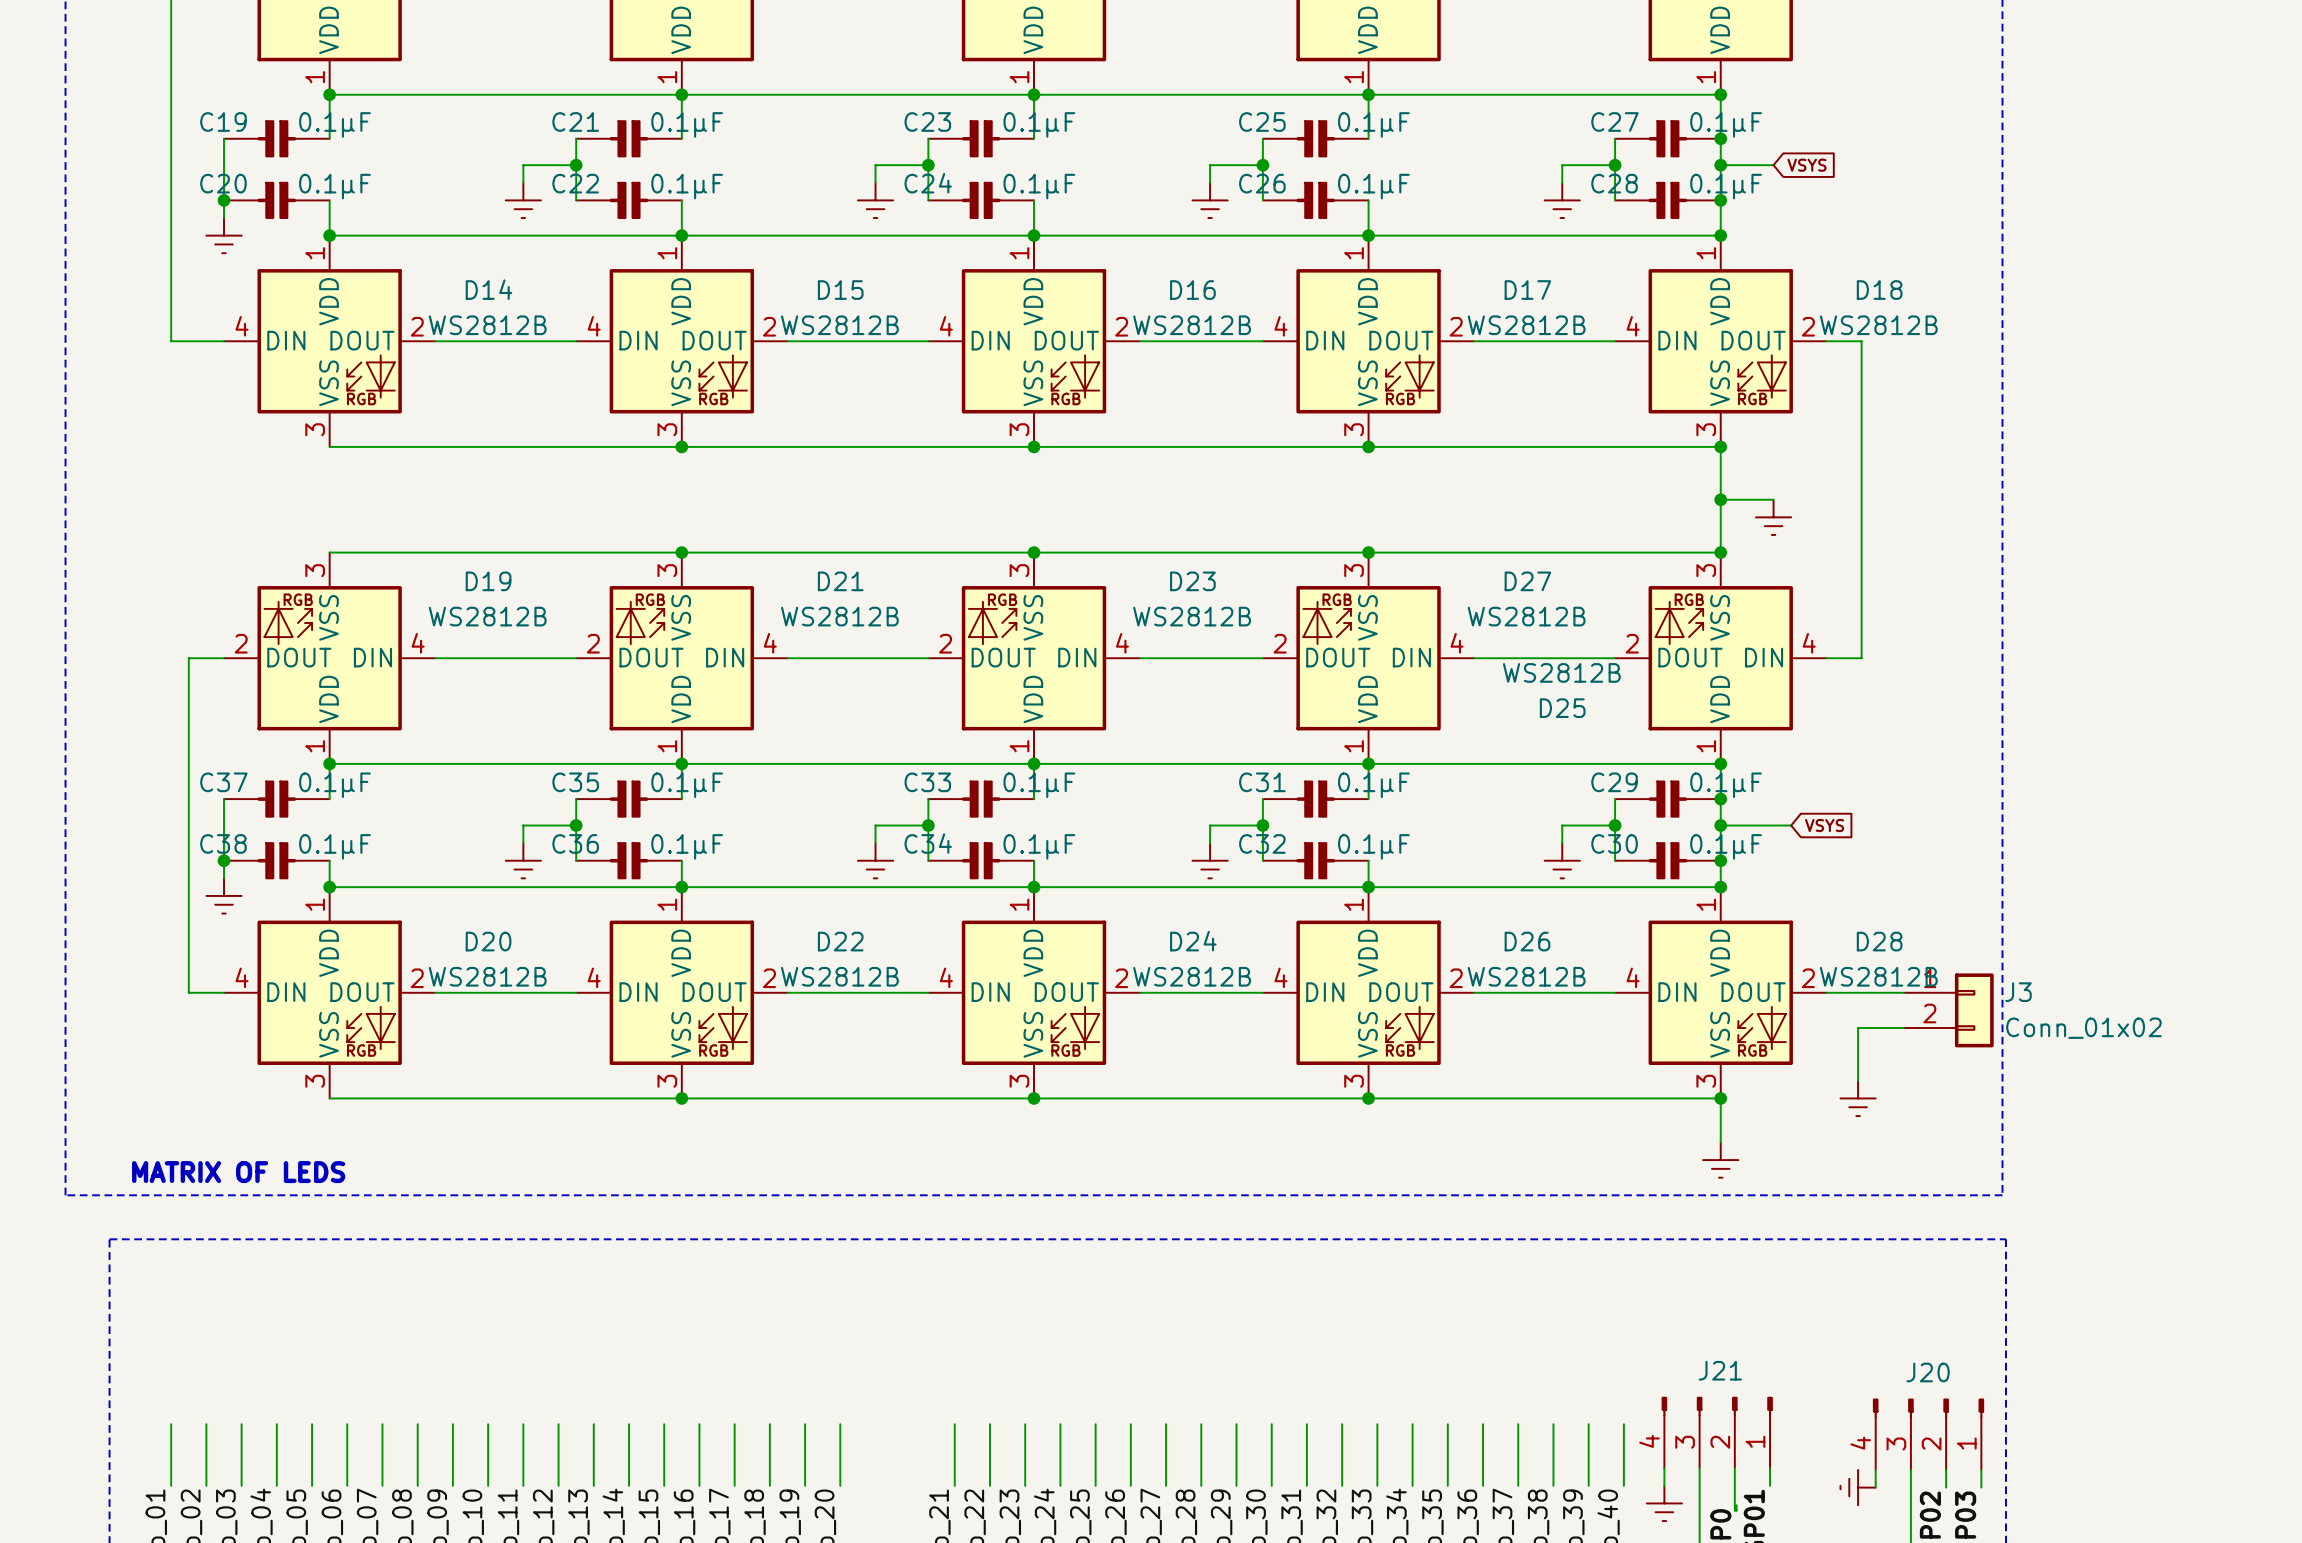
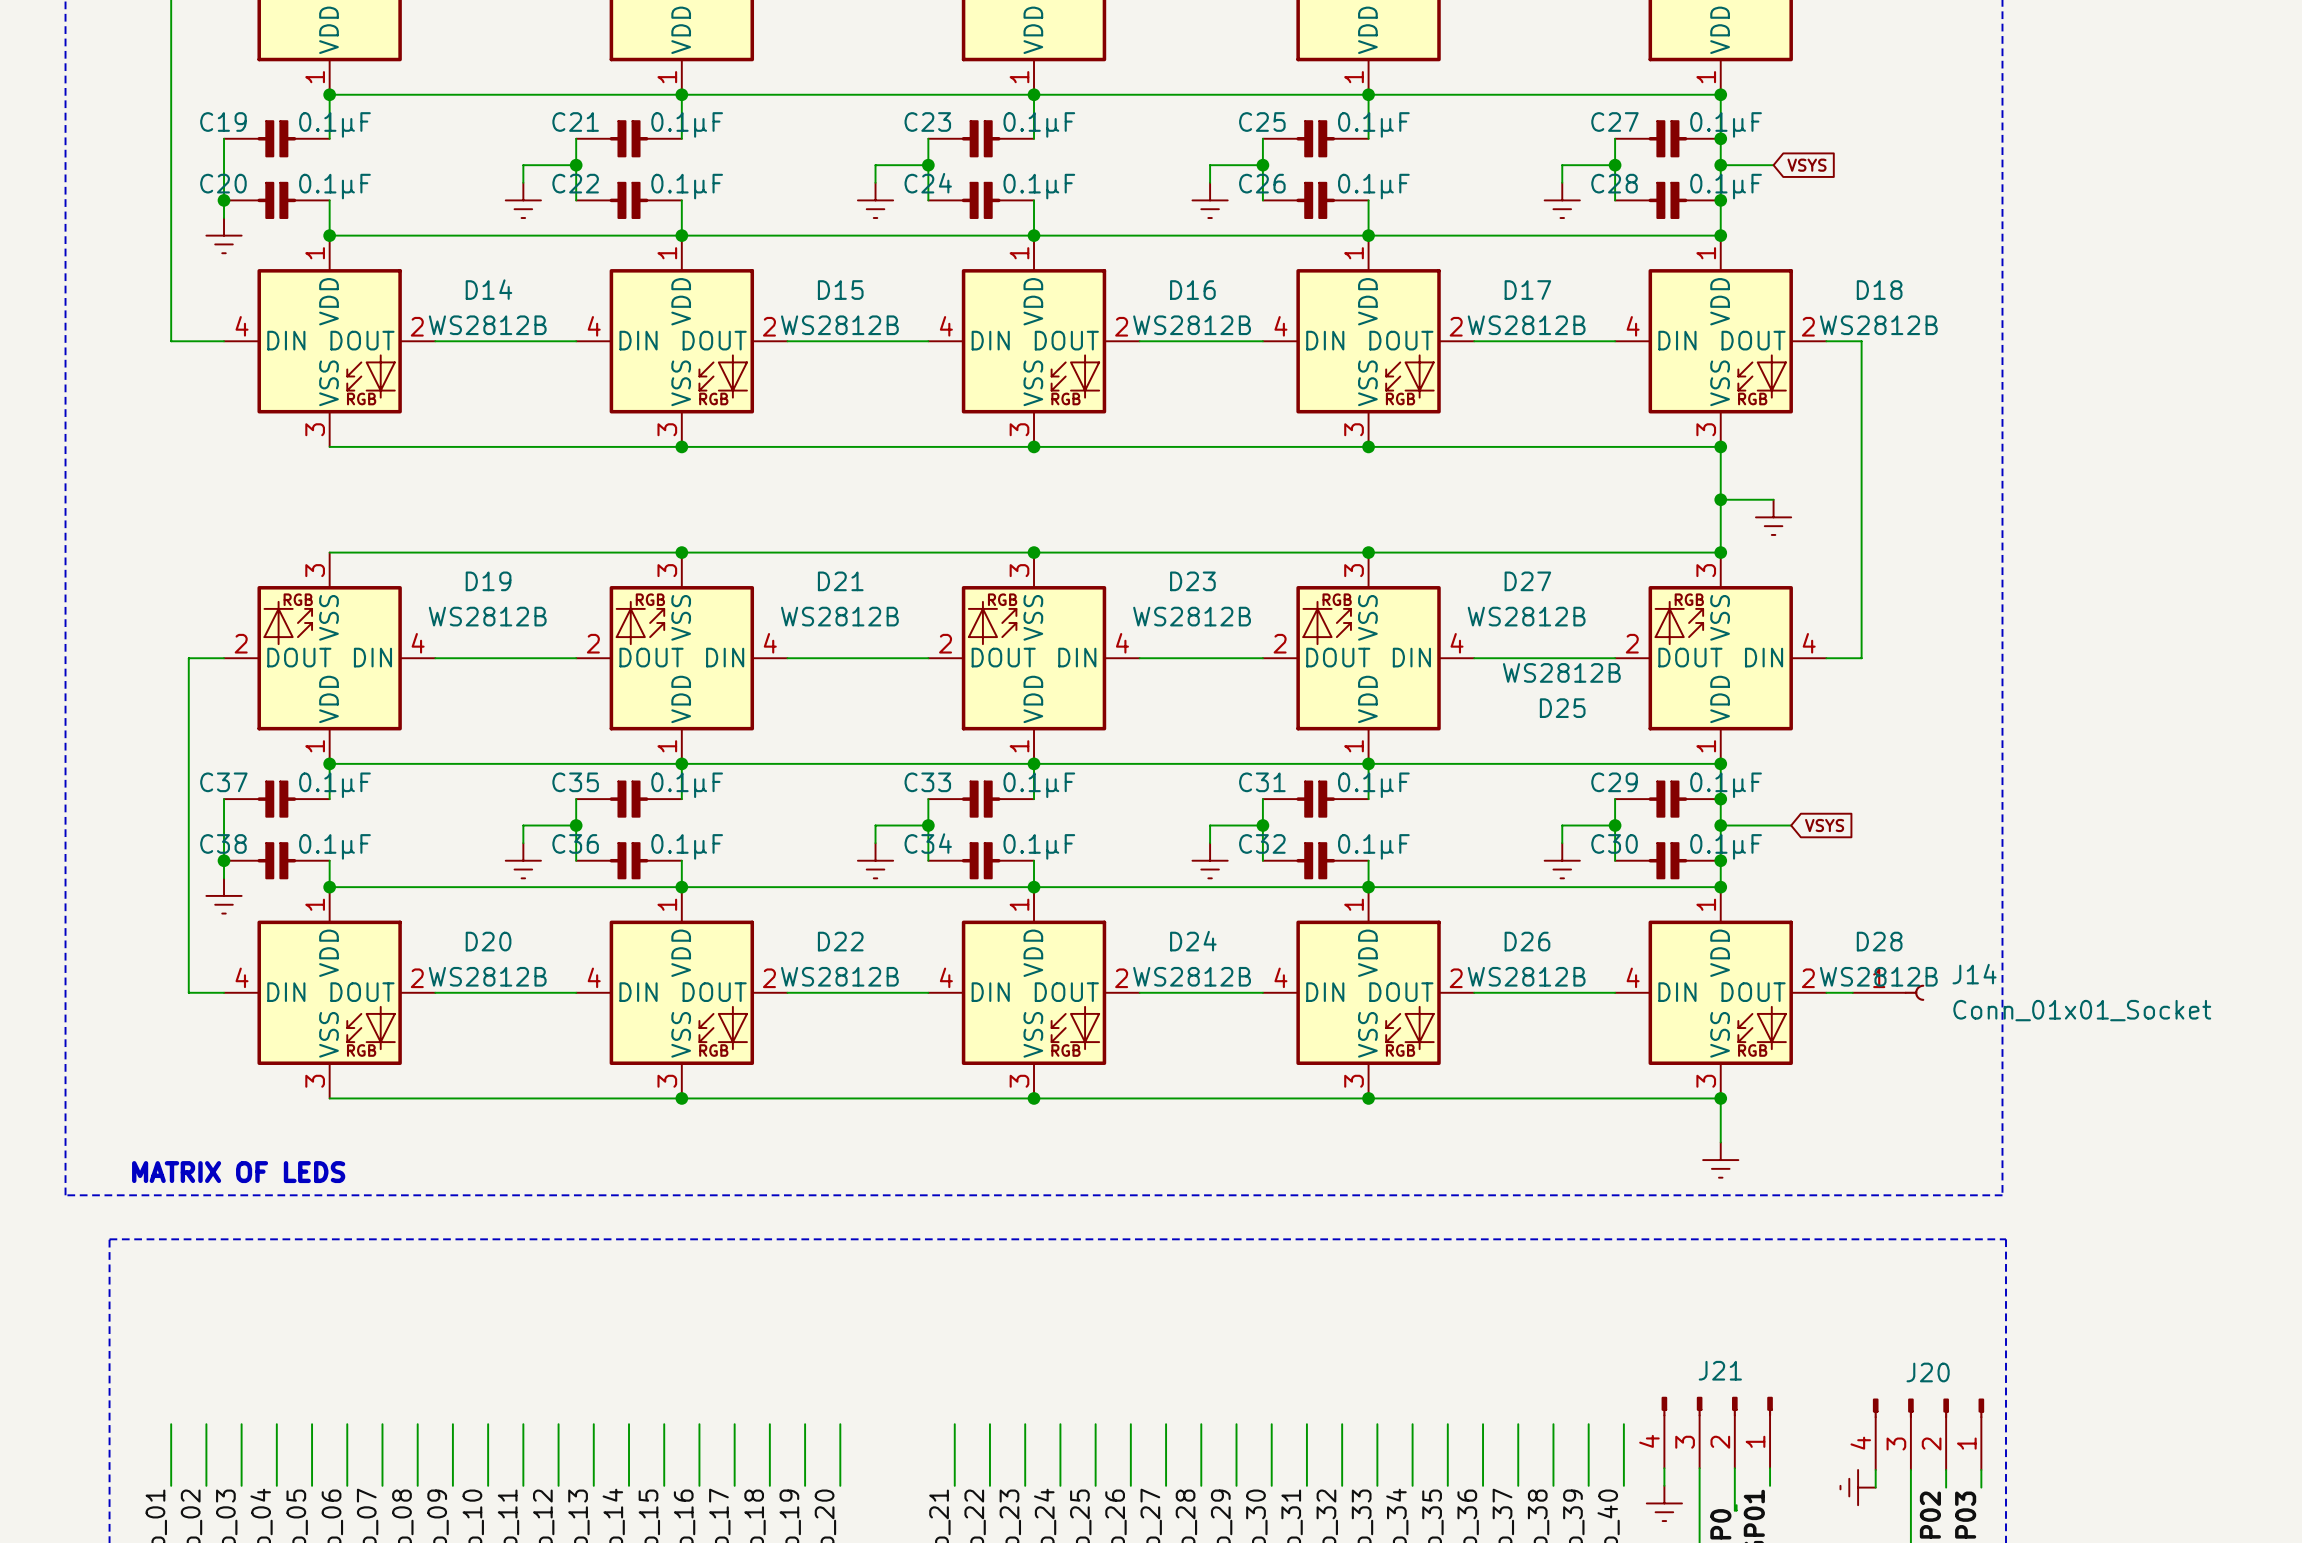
J14: none -> Conn_01x01_Socket (1888, 992)
J3: Conn_01x02 (1948, 1010) -> none
wire: (1903, 1028) (1858, 1028) (1858, 1080) -> none
power symbol: (1858, 1098) -> none

